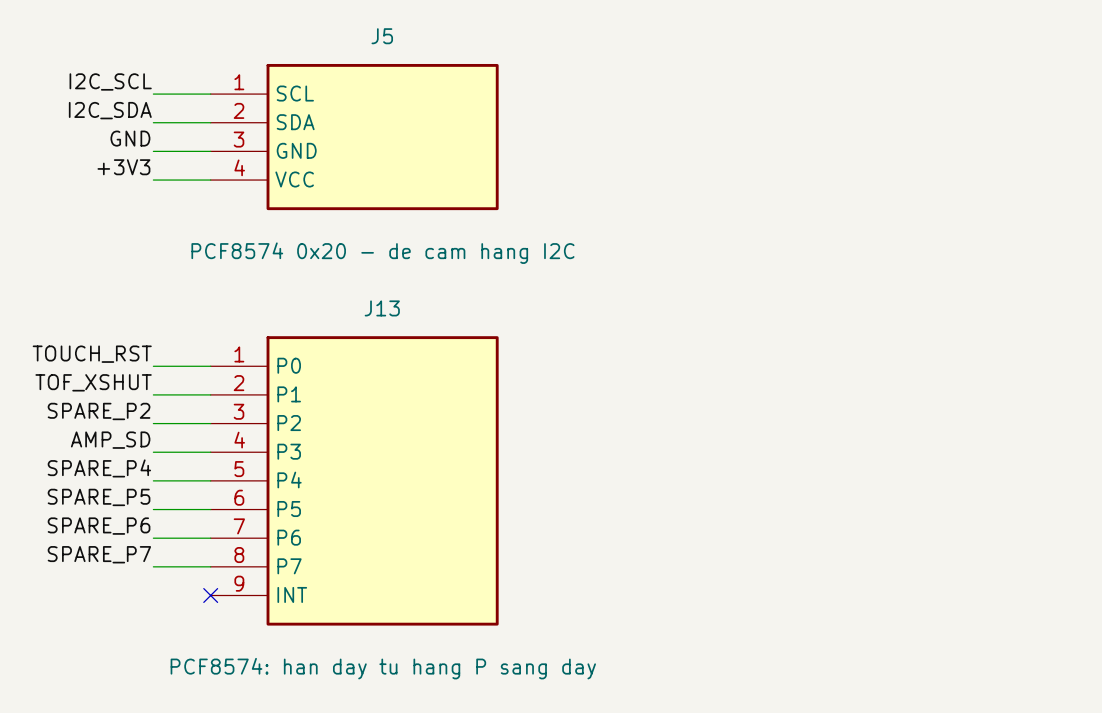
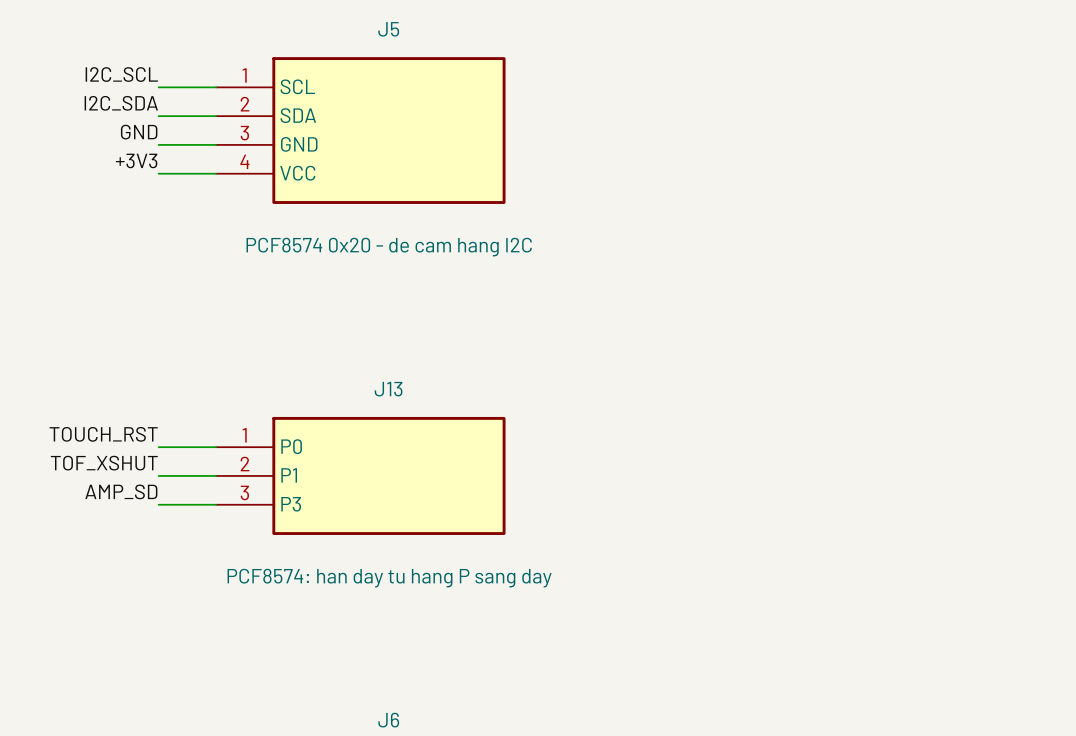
J13 name position: J13 (382, 308) -> J13 (388, 389)
J13 symbol: [210, 336, 499, 626] -> [216, 416, 506, 535]
label: TOUCH_RST (92, 354) -> none
wire: (153, 366) (210, 366) -> none
label: TOF_XSHUT (93, 382) -> none
wire: (153, 394) (210, 394) -> none
label: SPARE_P2 (99, 411) -> none
wire: (153, 423) (210, 423) -> none
label: AMP_SD (110, 440) -> TOUCH_RST (103, 434)
label: SPARE_P4 (99, 468) -> TOF_XSHUT (104, 463)
label: SPARE_P5 (99, 497) -> AMP_SD (121, 491)
label: SPARE_P6 (99, 526) -> none
wire: (153, 538) (210, 538) -> none
label: SPARE_P7 (99, 554) -> none
wire: (153, 566) (210, 566) -> none
no-connect mark: (210, 595) -> none
J13 value position: PCF8574: han day tu hang P sang day (383, 668) -> PCF8574: han day tu hang P sang day (389, 578)

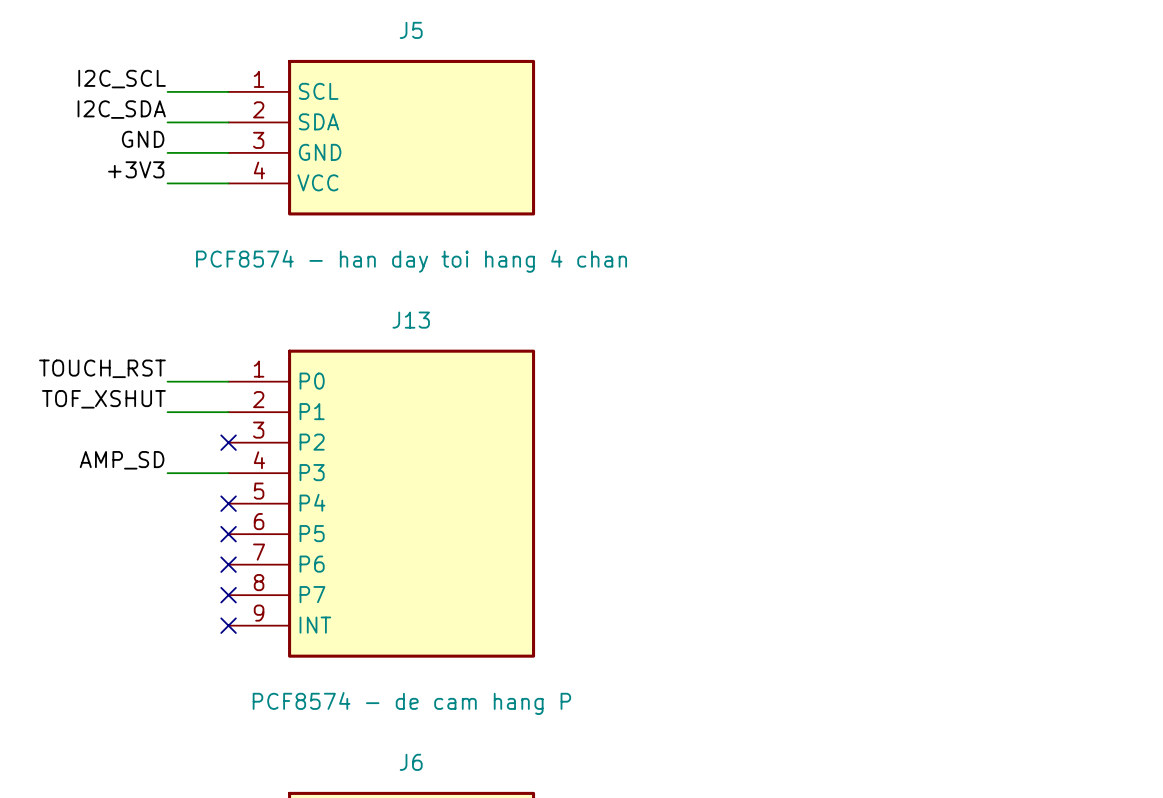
J5 value: PCF8574 0x20 - de cam hang I2C (389, 247) -> PCF8574 - han day toi hang 4 chan (411, 261)
label: none -> TOUCH_RST (102, 368)
J13 name position: J13 (388, 389) -> J13 (411, 320)
J13 symbol: [216, 416, 506, 535] -> [228, 349, 536, 658]
no-connect mark: none -> (228, 442)
label: TOUCH_RST (103, 434) -> AMP_SD (122, 460)
label position: TOF_XSHUT (104, 463) -> TOF_XSHUT (103, 399)
wire: (158, 475) (216, 475) -> (167, 381) (228, 381)
no-connect mark: none -> (228, 503)
label: AMP_SD (121, 491) -> none
wire: (158, 504) (216, 504) -> (167, 412) (228, 412)
no-connect mark: none -> (228, 534)
no-connect mark: none -> (228, 564)
no-connect mark: none -> (228, 595)
J13 value: PCF8574: han day tu hang P sang day (389, 578) -> PCF8574 - de cam hang P (411, 703)
no-connect mark: none -> (228, 625)

